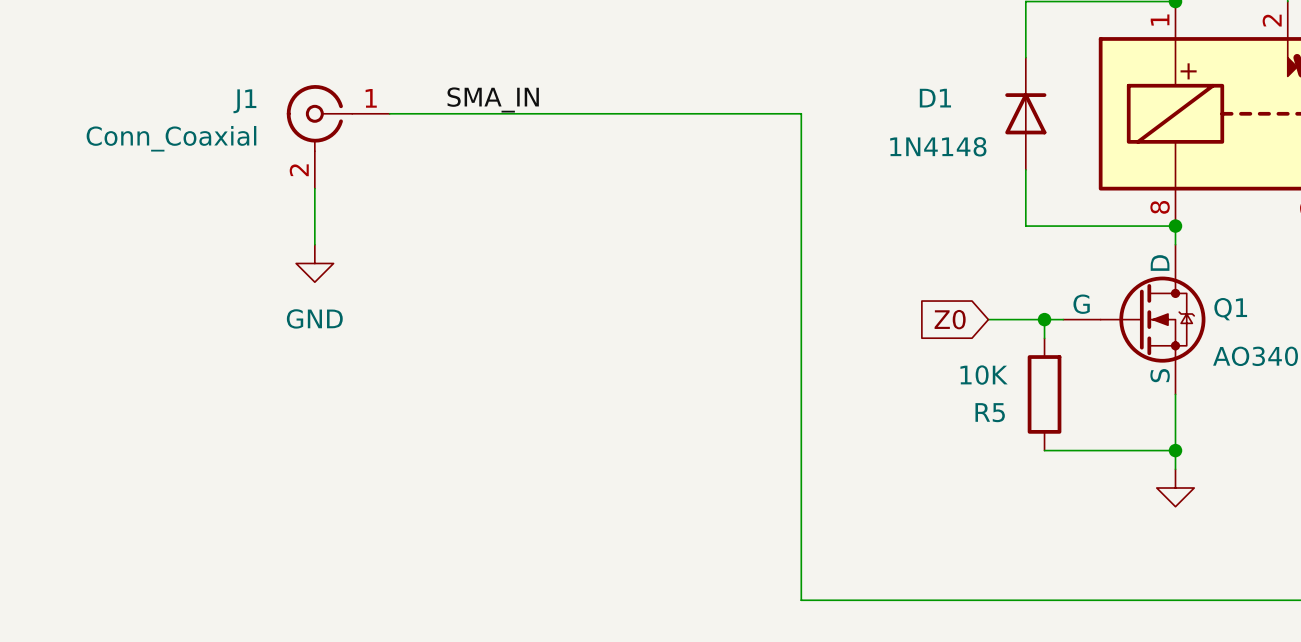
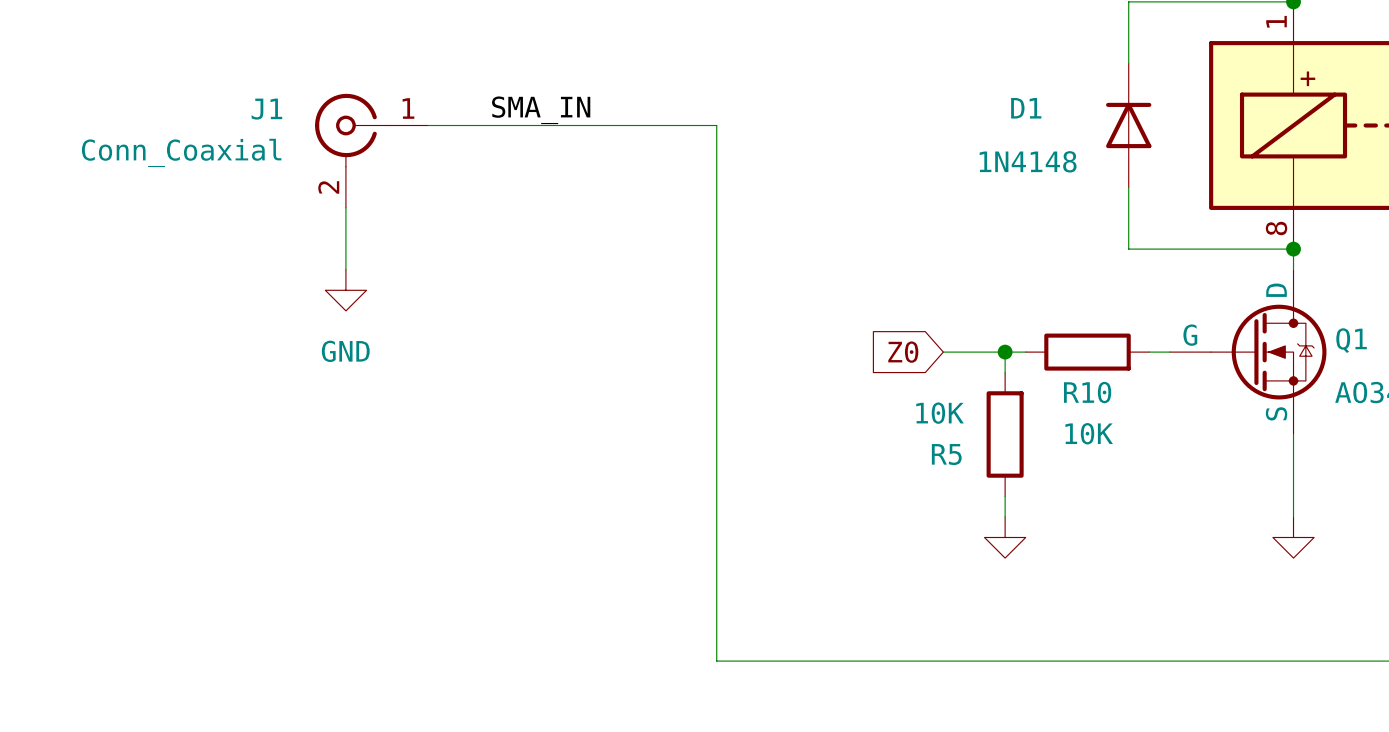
wire: (651, 113) (801, 113) (801, 600) -> (716, 125) (716, 661) (881, 661)
wire: none -> (943, 352) (1025, 352)
wire: none -> (1005, 352) (1005, 372)
junction: none -> (1005, 352)
global label position: Z0 (950, 319) -> Z0 (903, 352)
wire: (988, 319) (1044, 319) (1044, 338) -> none
R10: none -> 10K (1087, 352)
junction: (1044, 319) -> none
R5 position: (1044, 394) -> (1005, 434)
wire: none -> (1005, 496) (1005, 516)
wire: (1044, 450) (1175, 450) -> none
junction: (1175, 450) -> none
power symbol: none -> (1005, 537)

